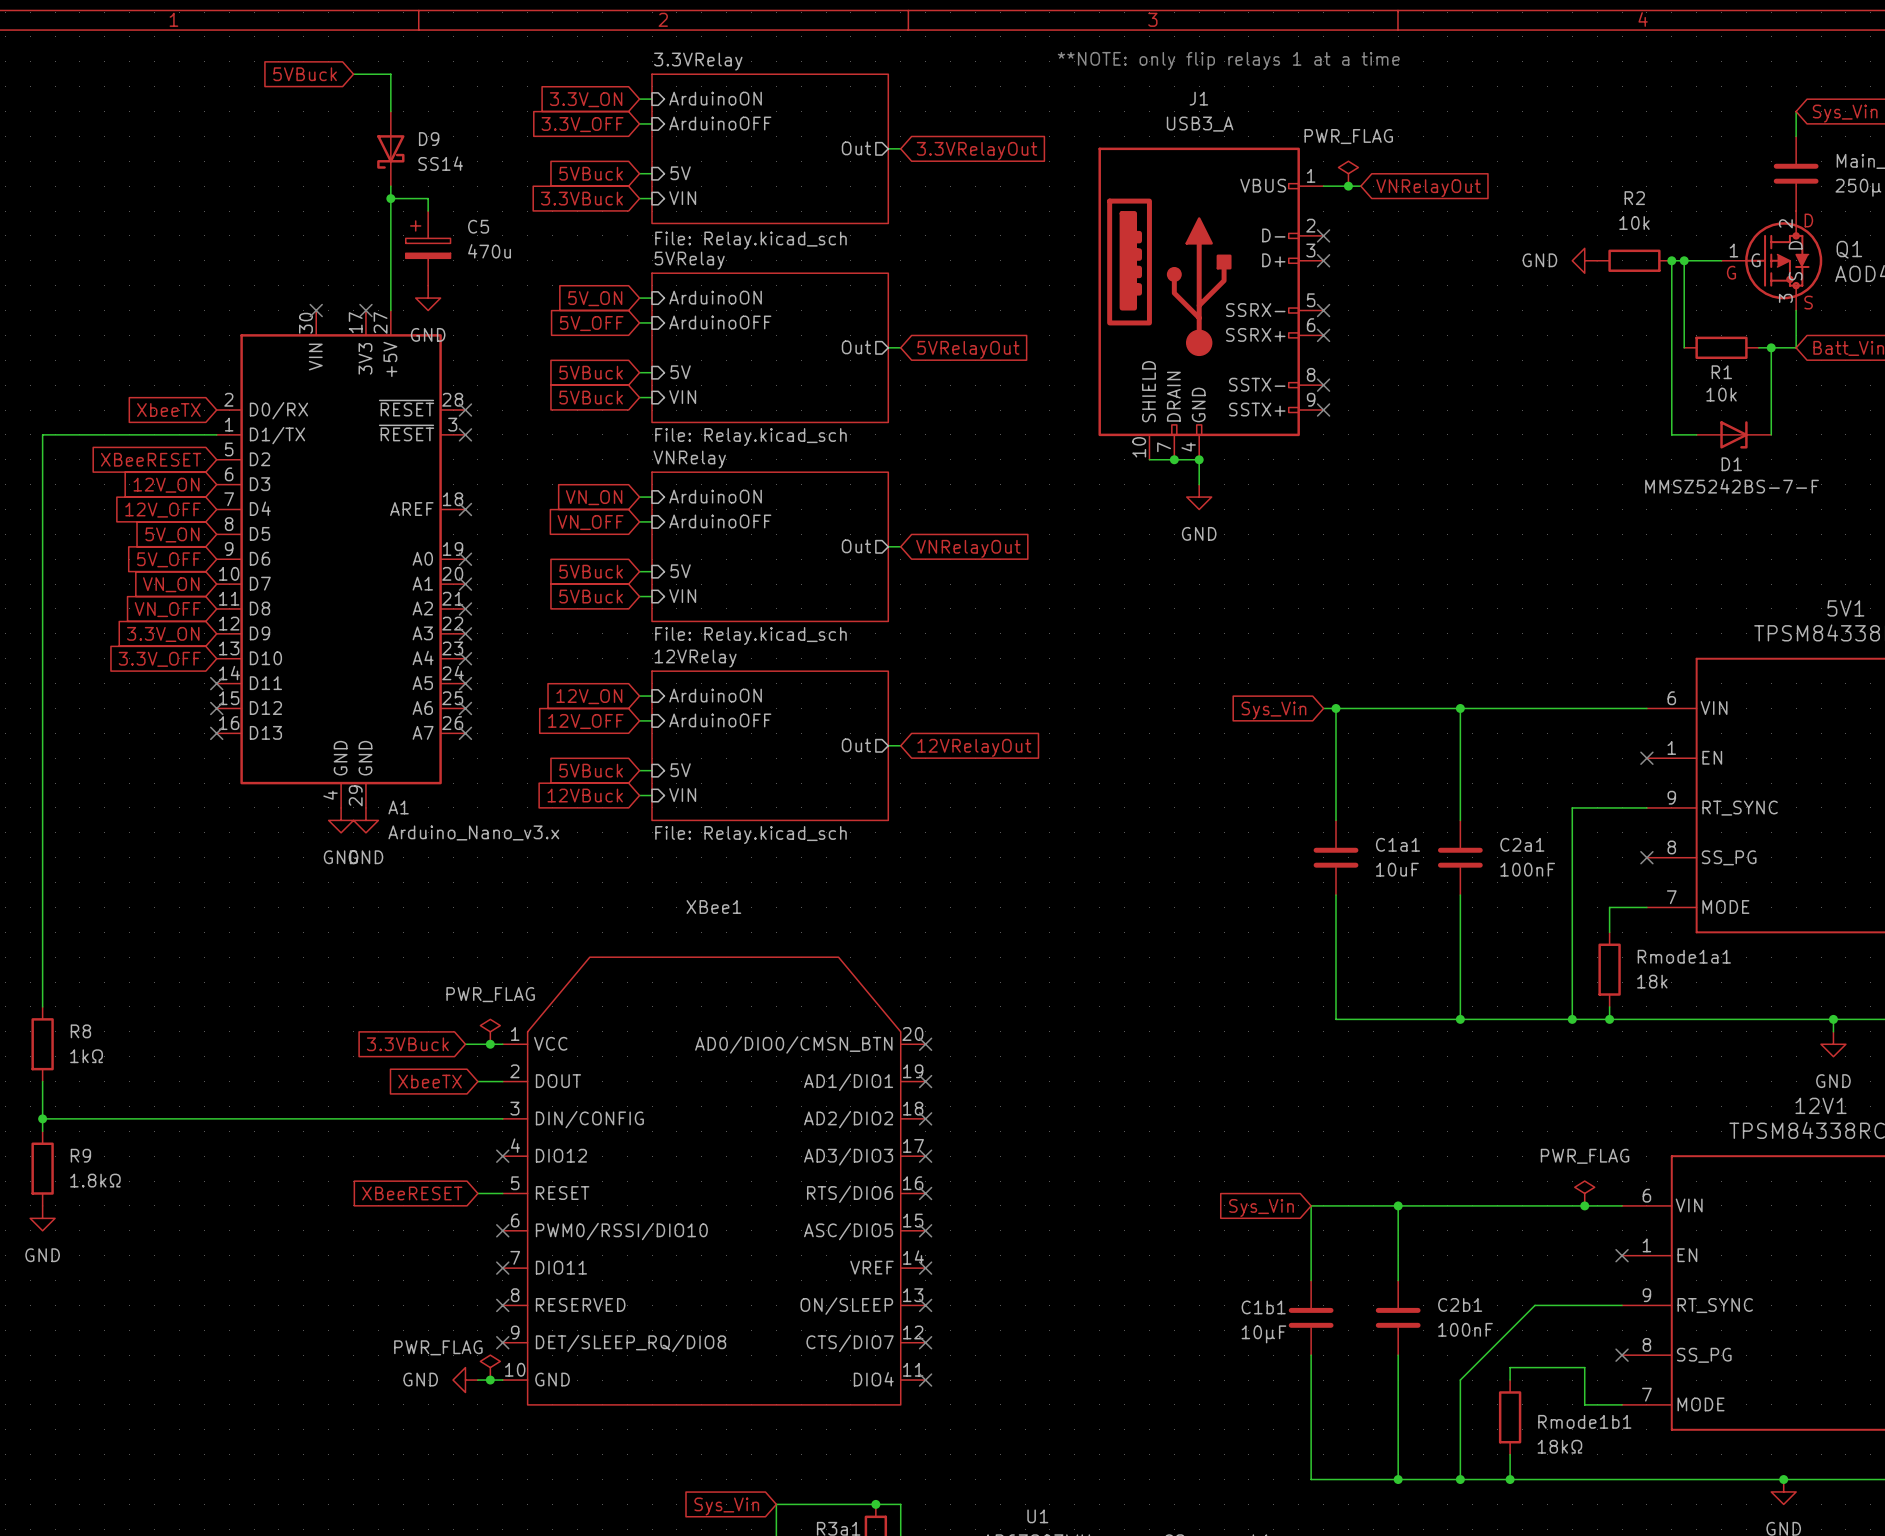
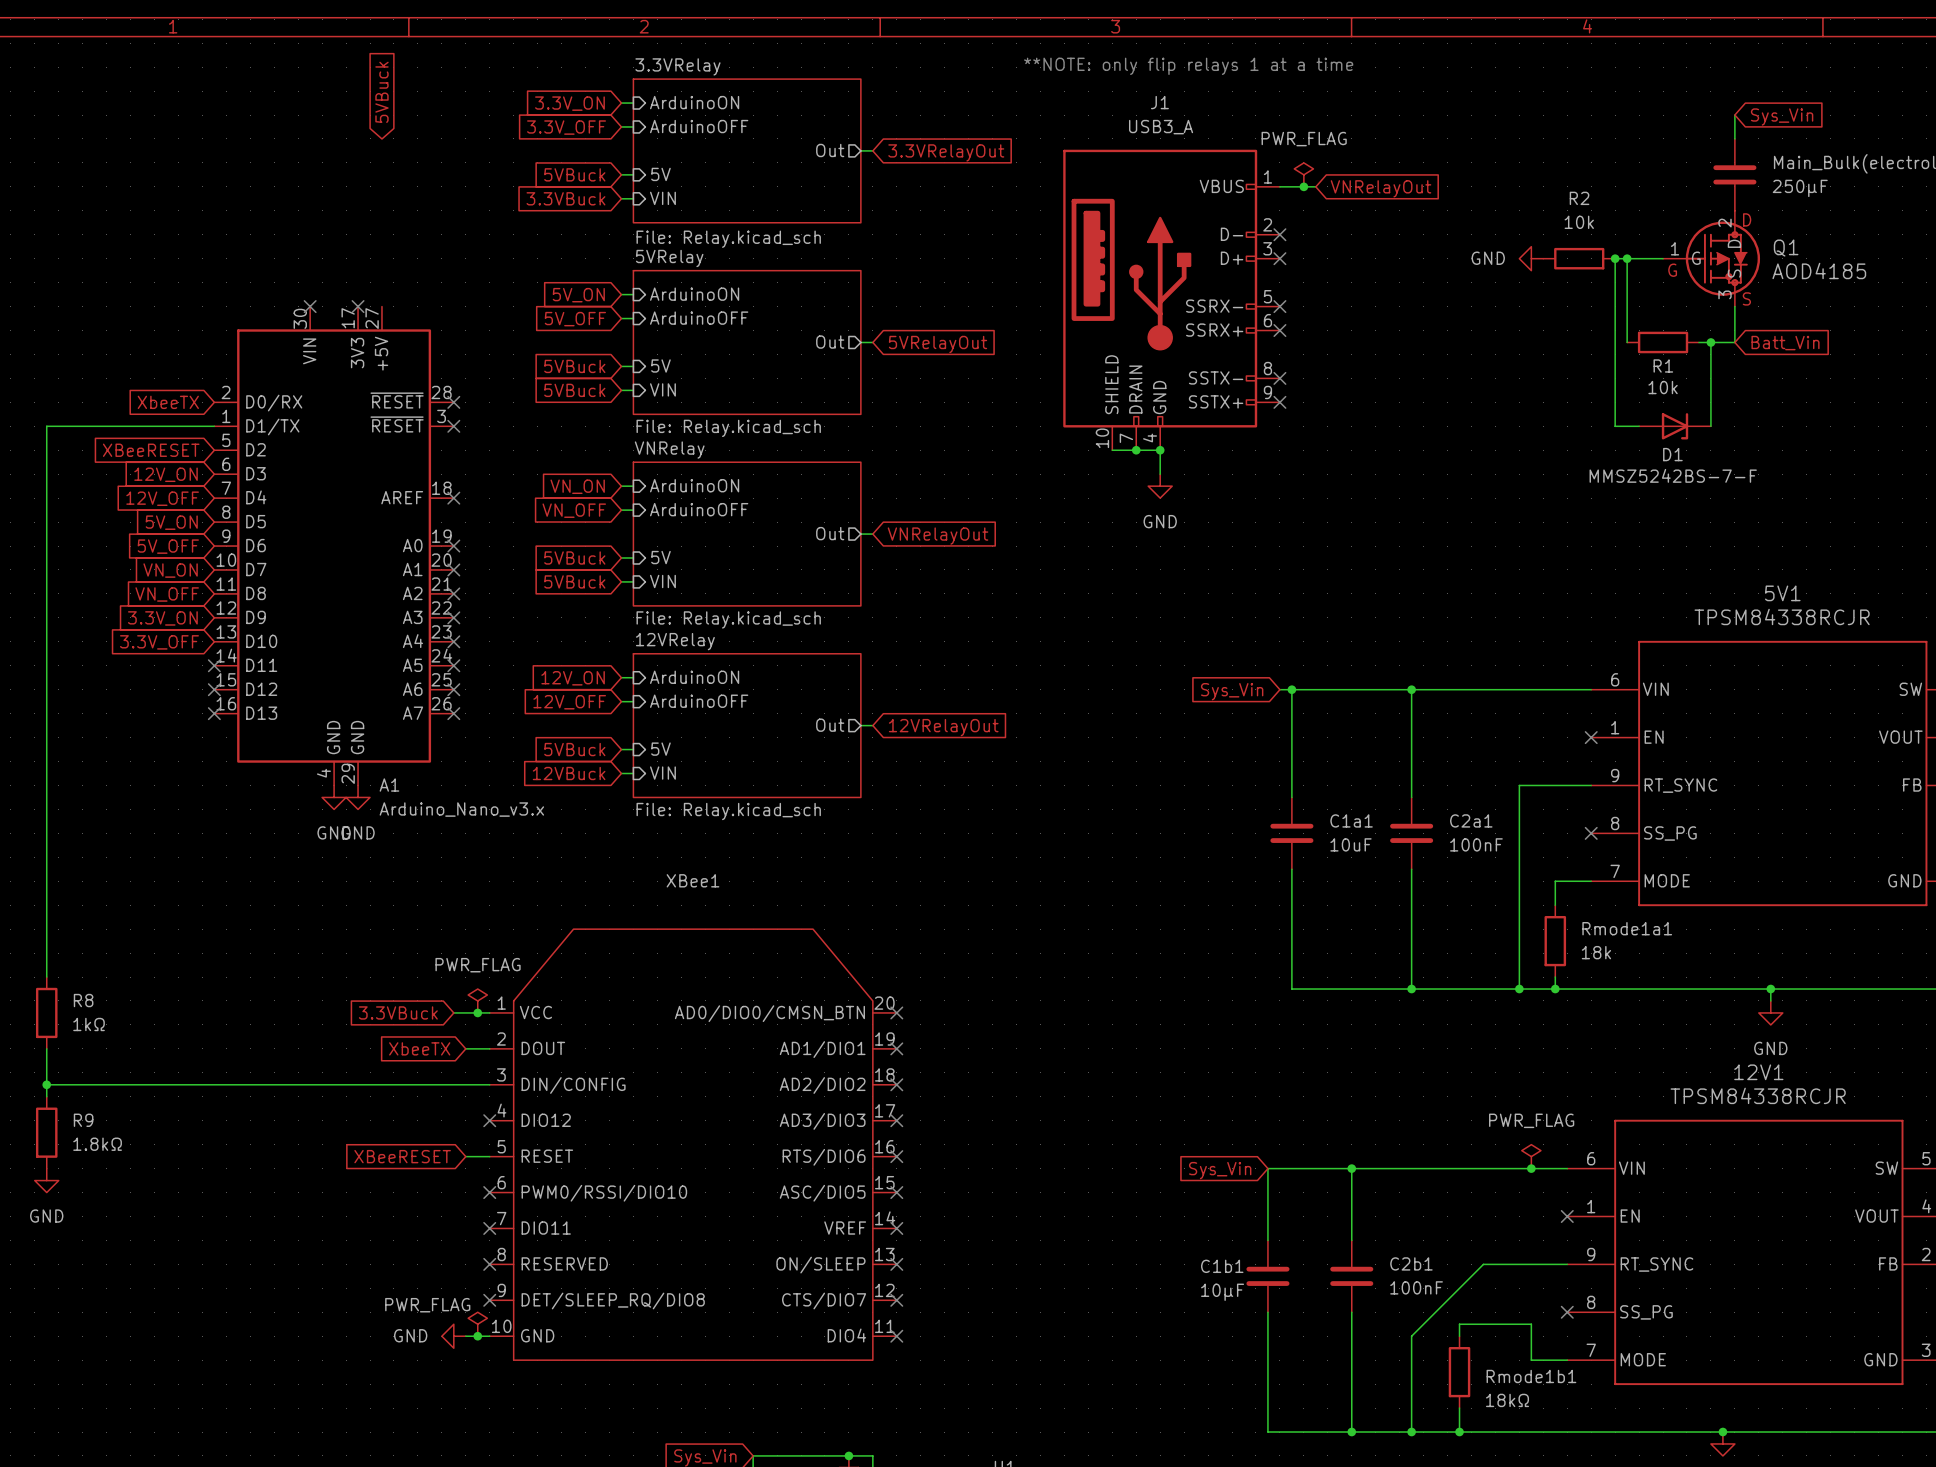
global label rotation: 0° (305, 74) -> 90° clockwise (381, 92)
wire: (353, 74) (390, 74) (390, 111) -> none
D9: SS14 (390, 148) -> none
wire: (390, 186) (390, 310) -> none
wire: (390, 198) (428, 198) (428, 211) -> none
junction: (390, 198) -> none
C5: 470u (428, 248) -> none
power symbol: GND (428, 298) -> none

